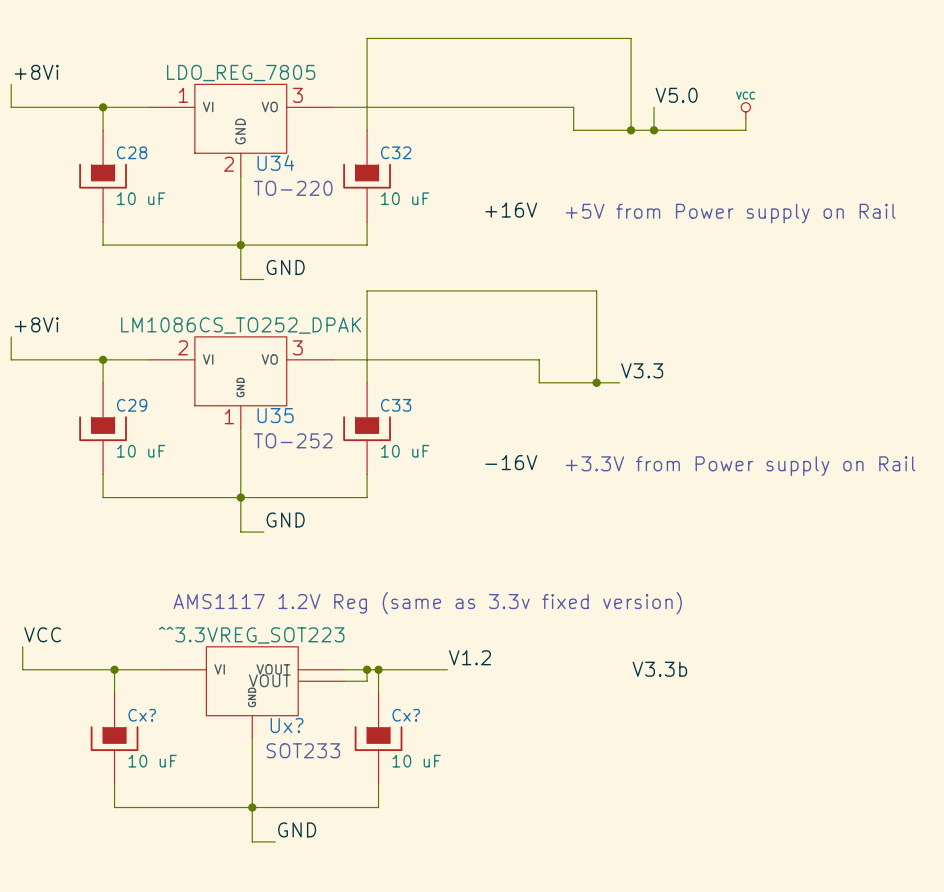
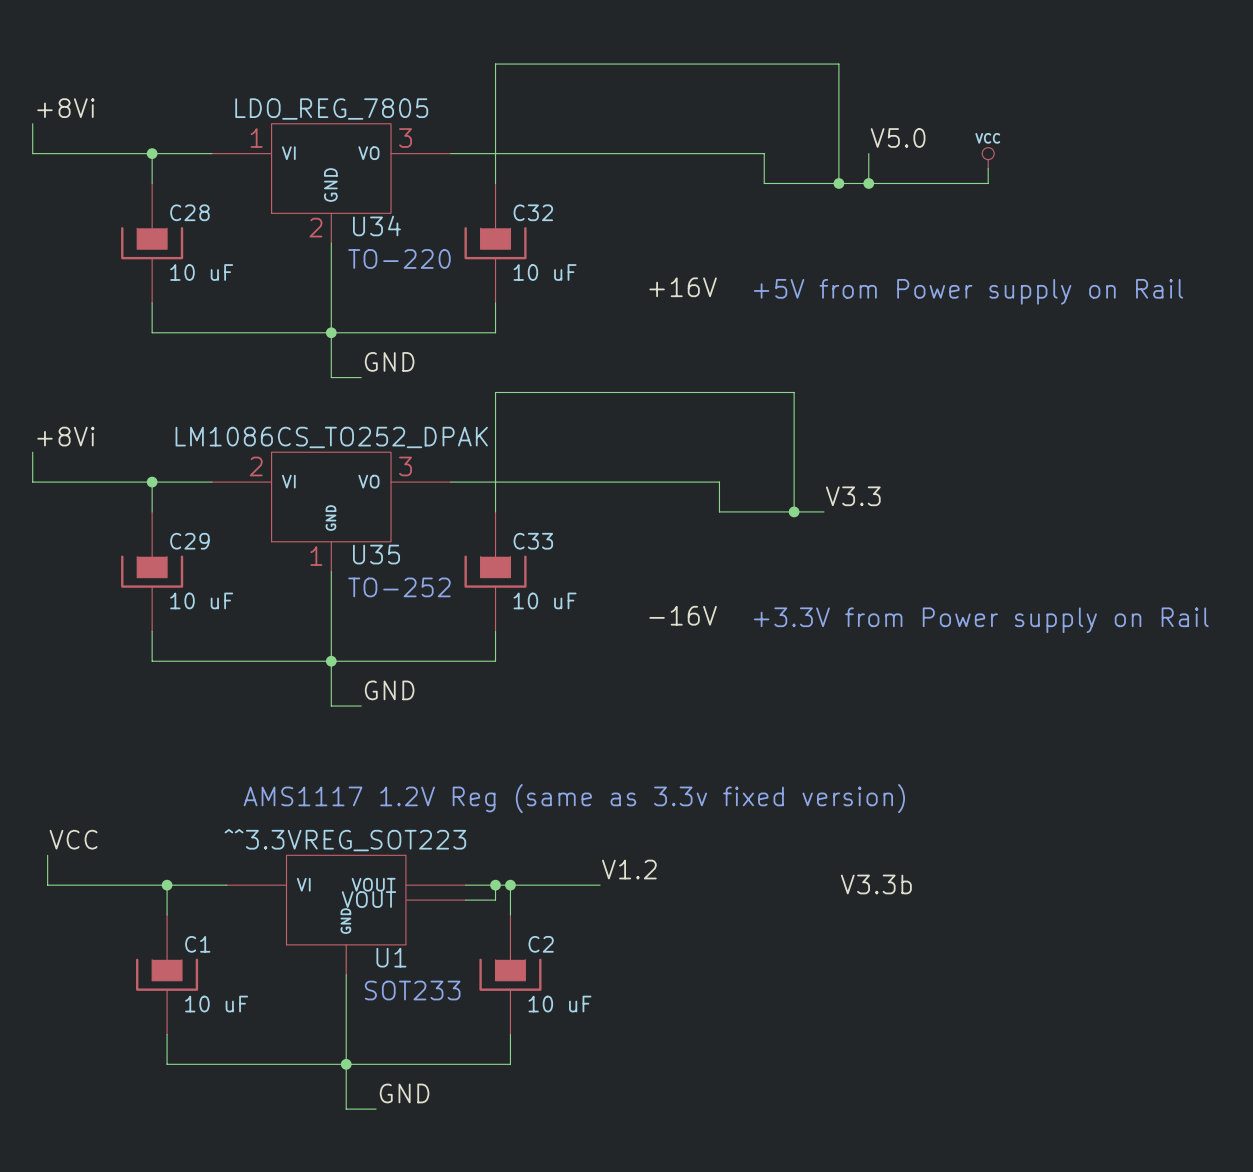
Cx? name: Cx? (142, 715) -> C1 (197, 944)
Cx? name: Cx? (406, 715) -> C2 (541, 944)
Ux? name: Ux? (287, 725) -> U1 (391, 957)

